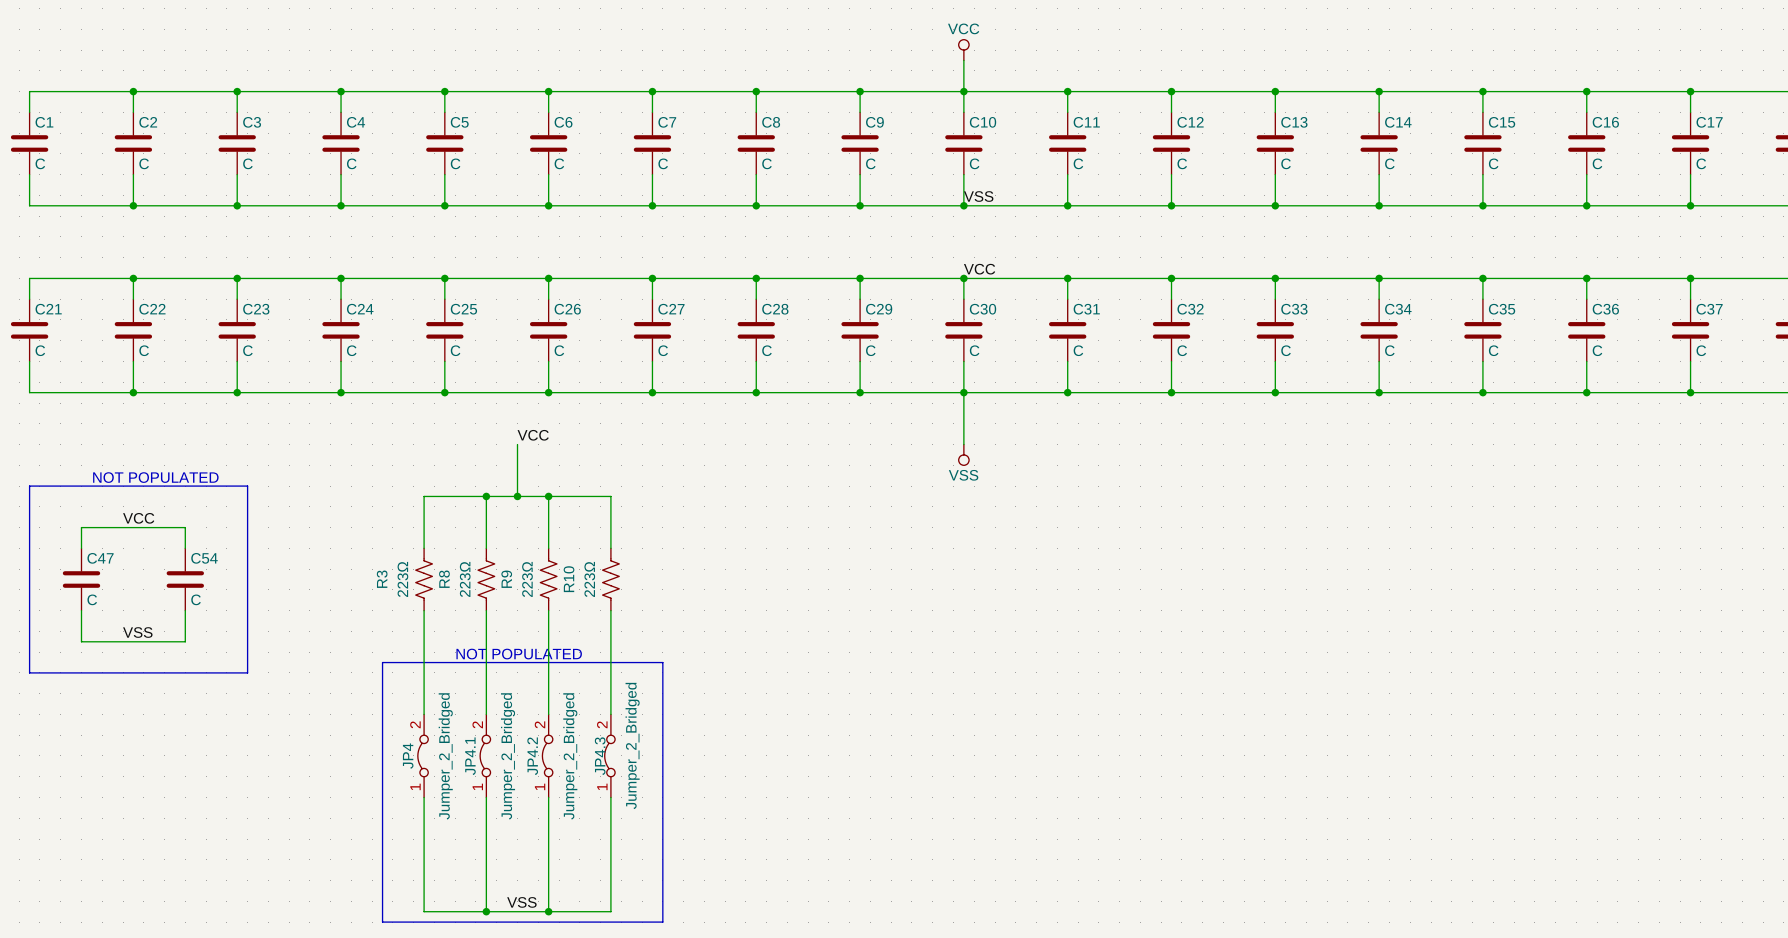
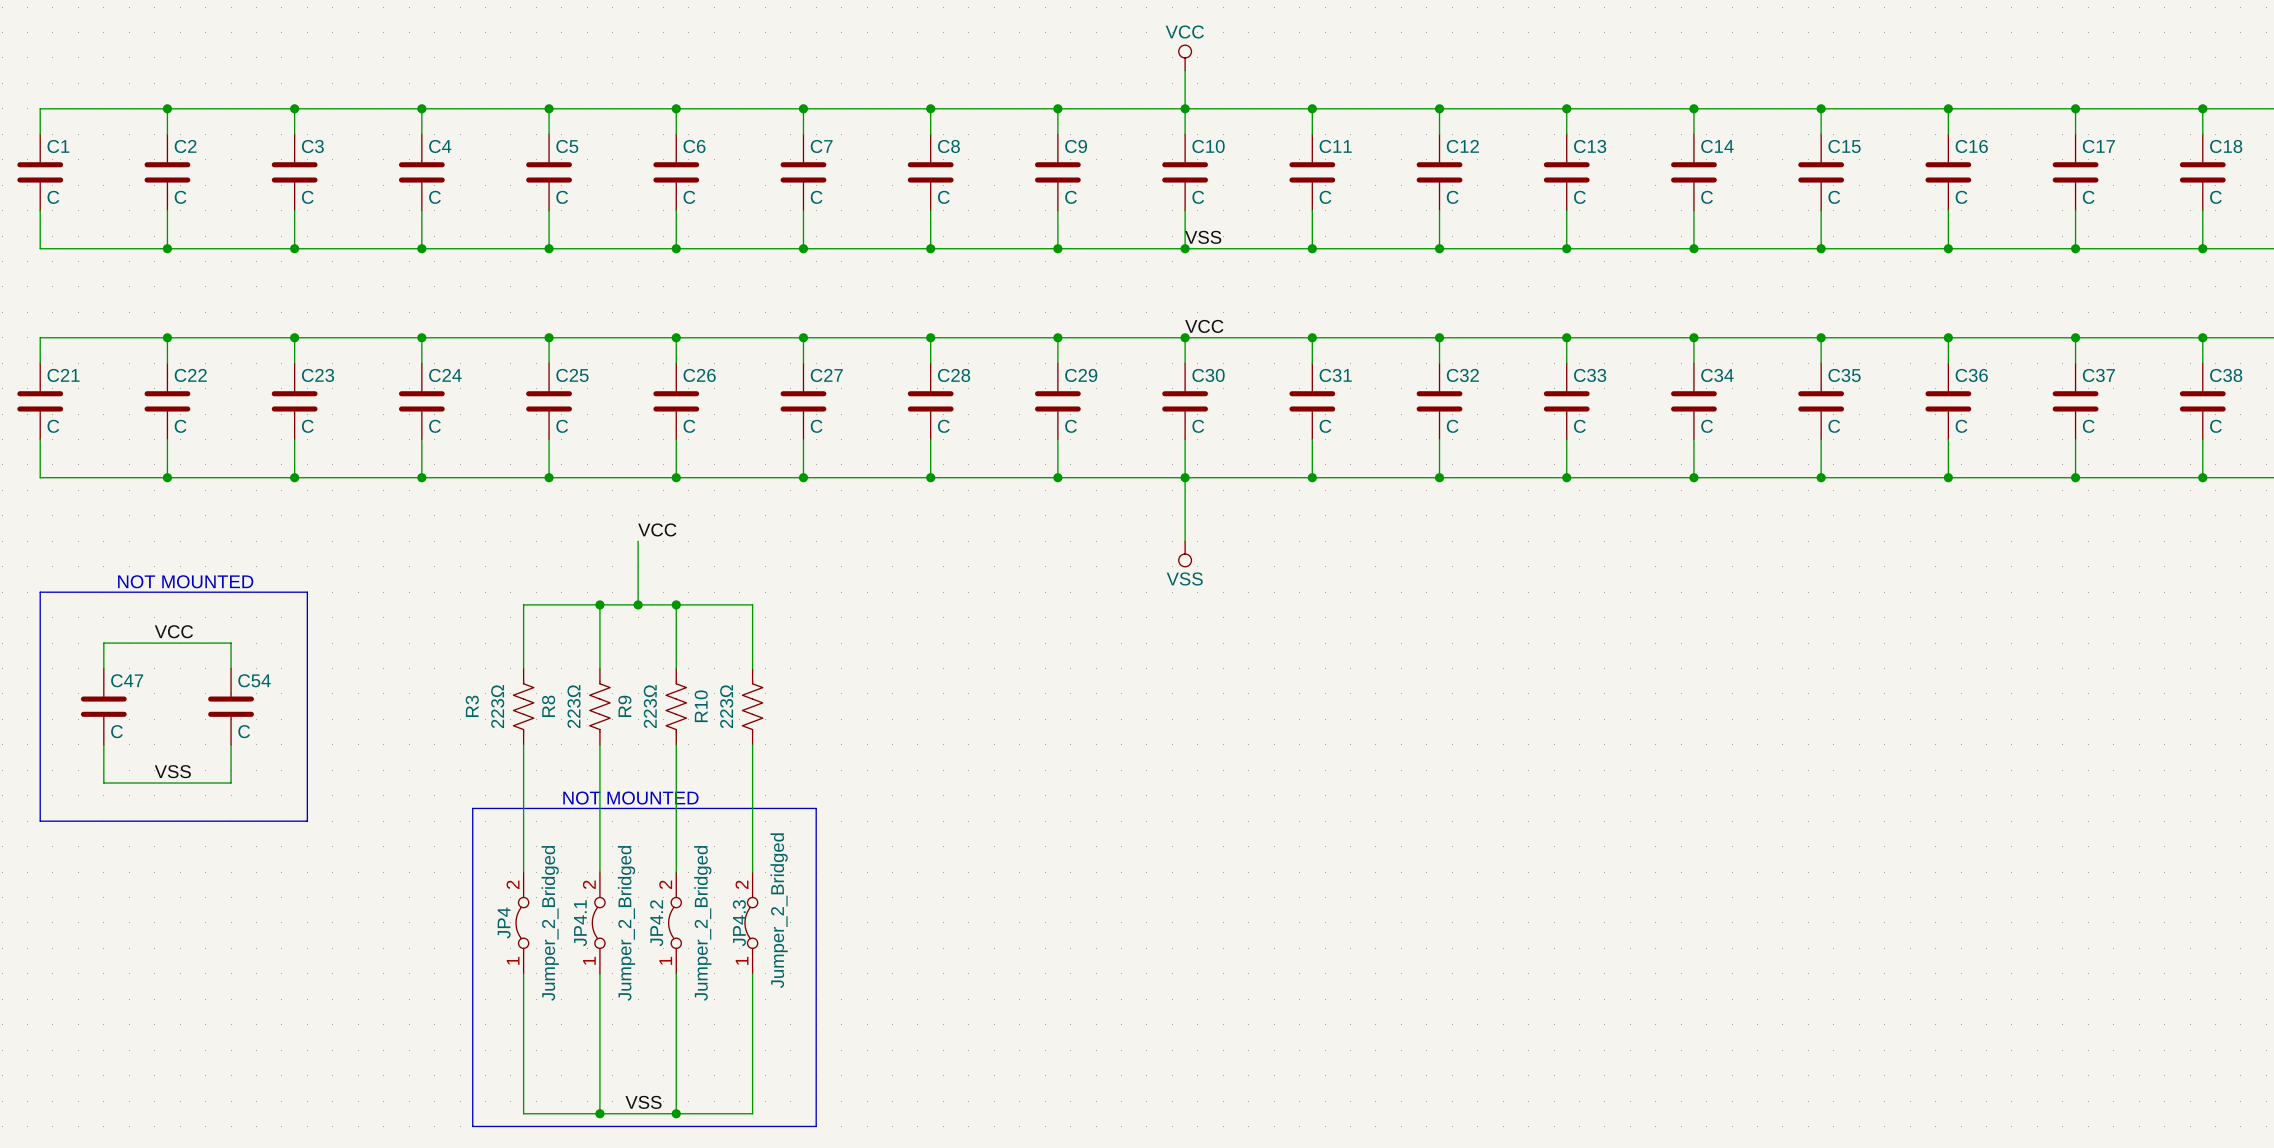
text: NOT POPULATED (155, 477) -> NOT MOUNTED (185, 581)
text: NOT POPULATED (519, 654) -> NOT MOUNTED (630, 798)

